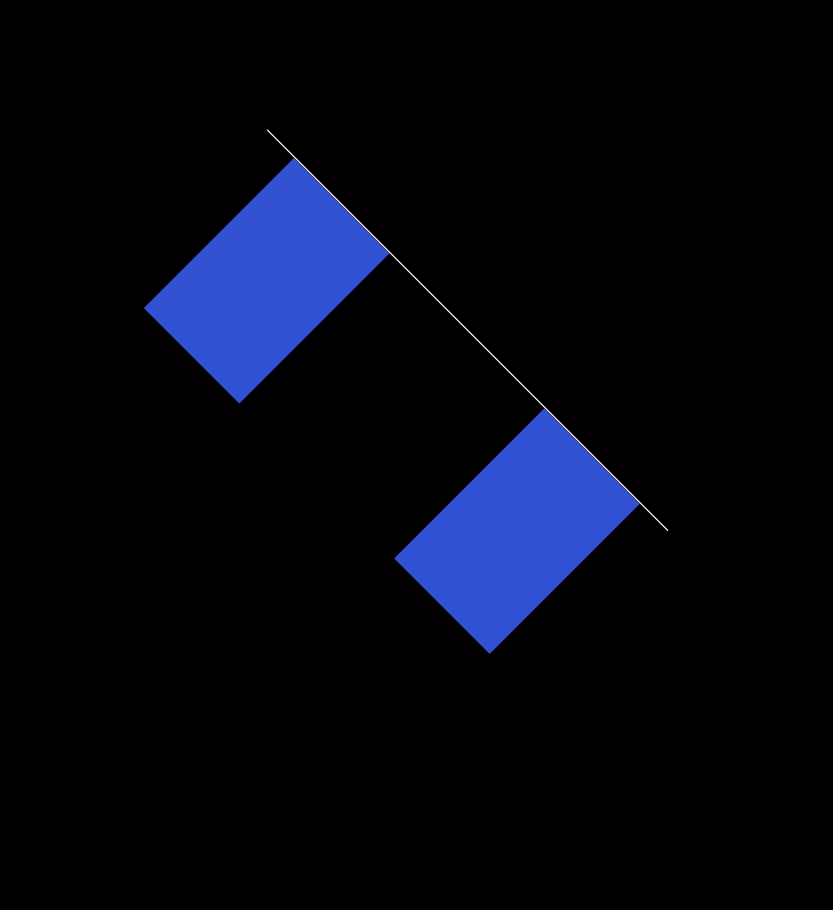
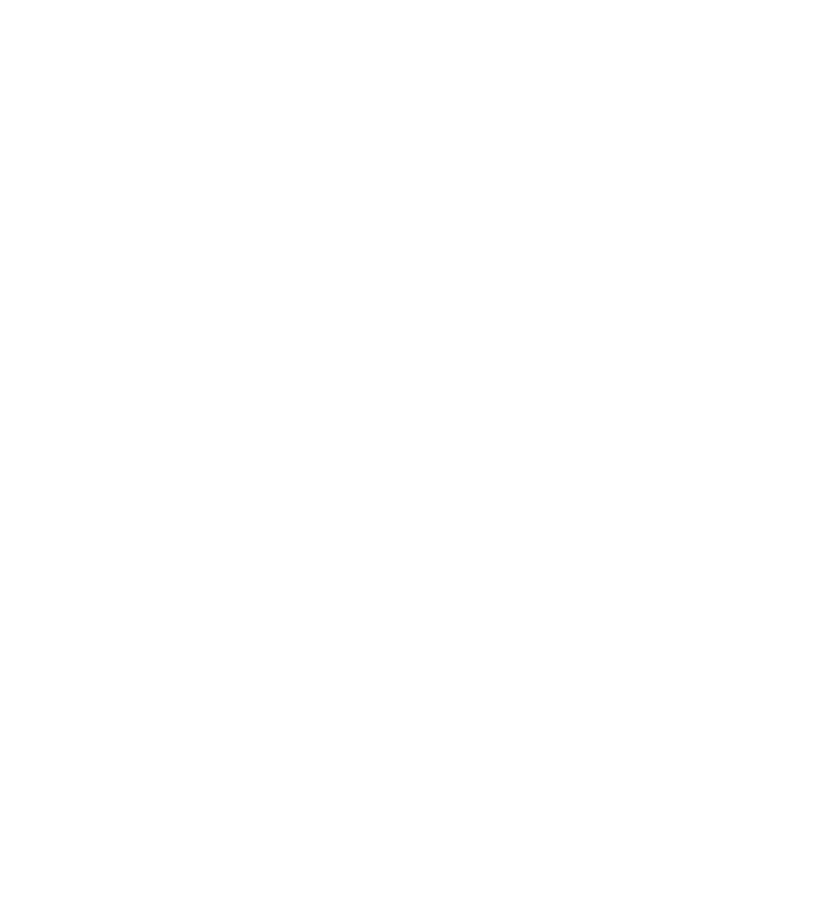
part: (405, 392) -> none

